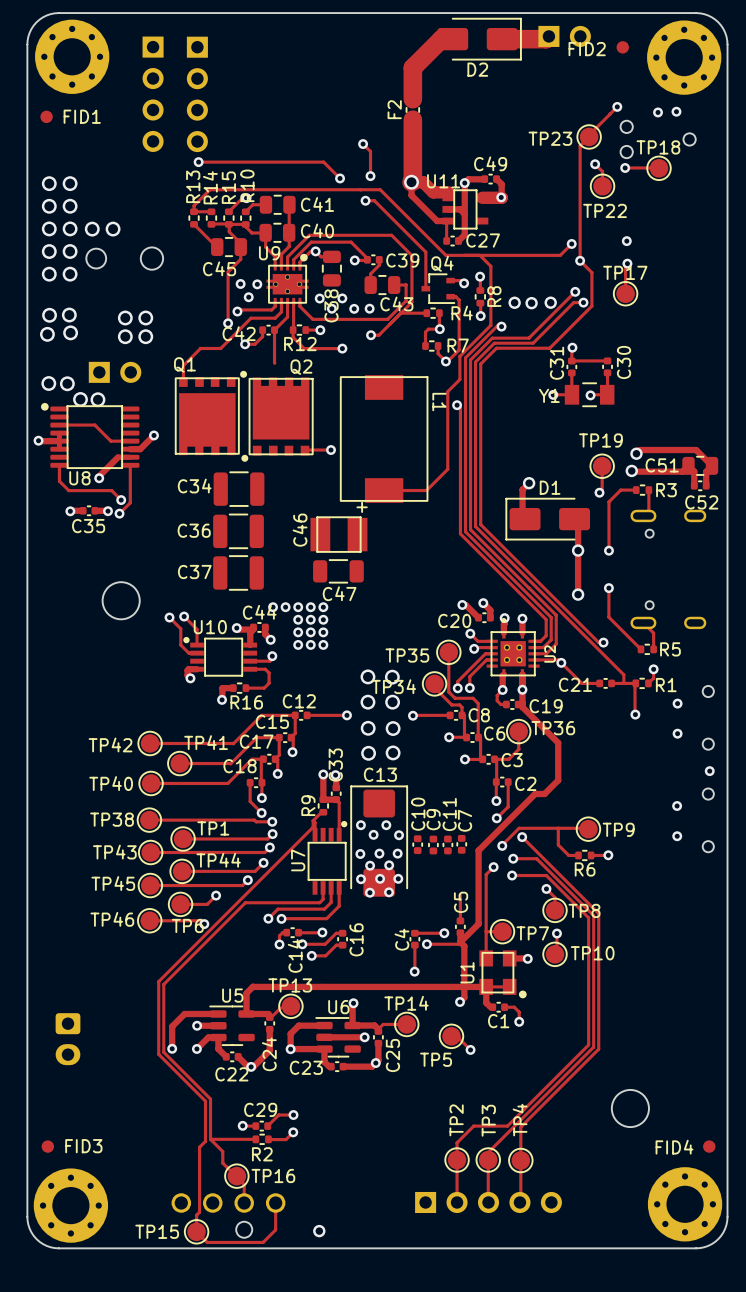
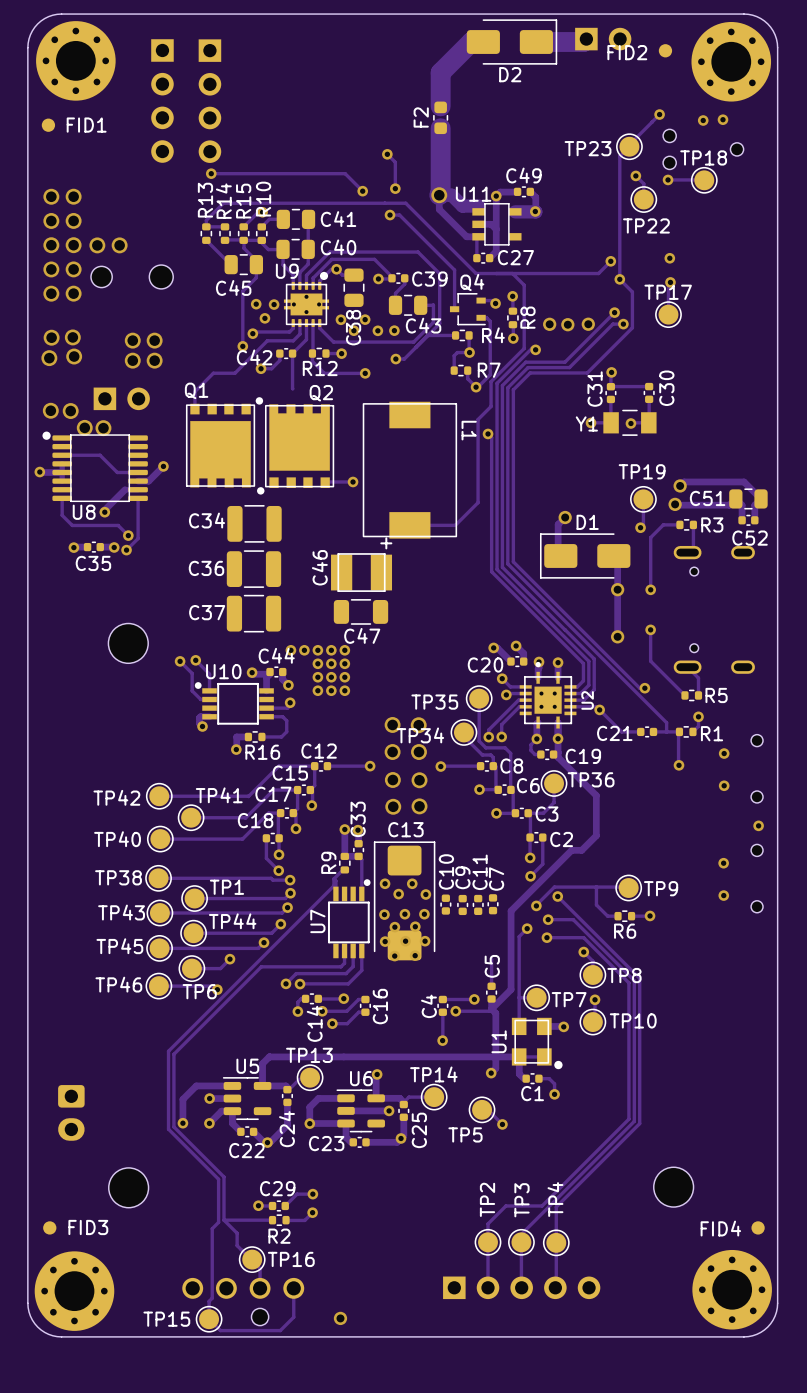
part: none -> (128, 1187)

